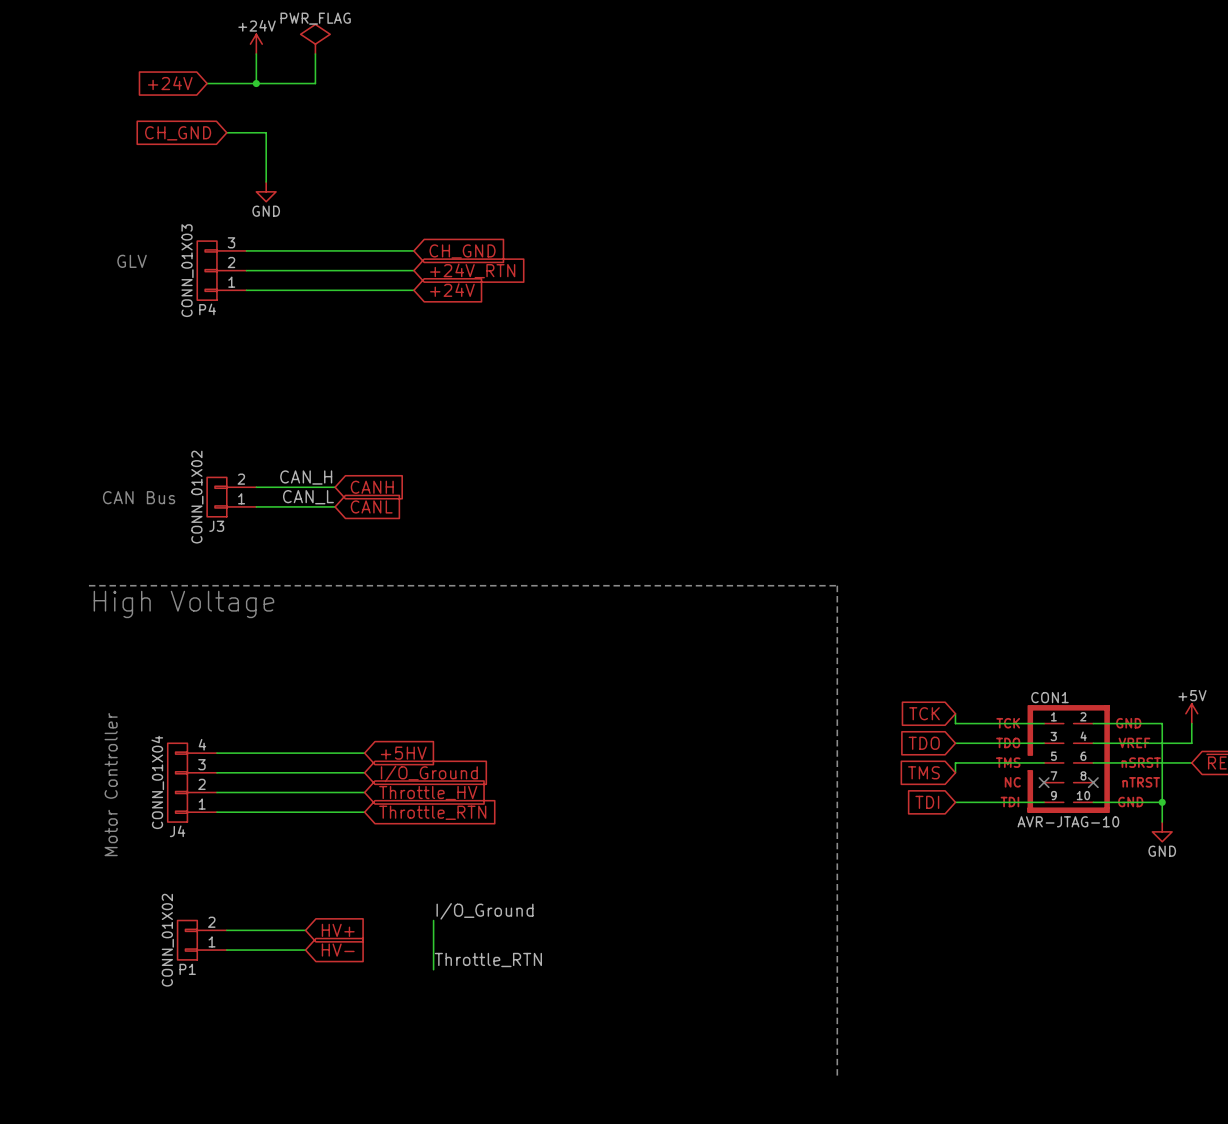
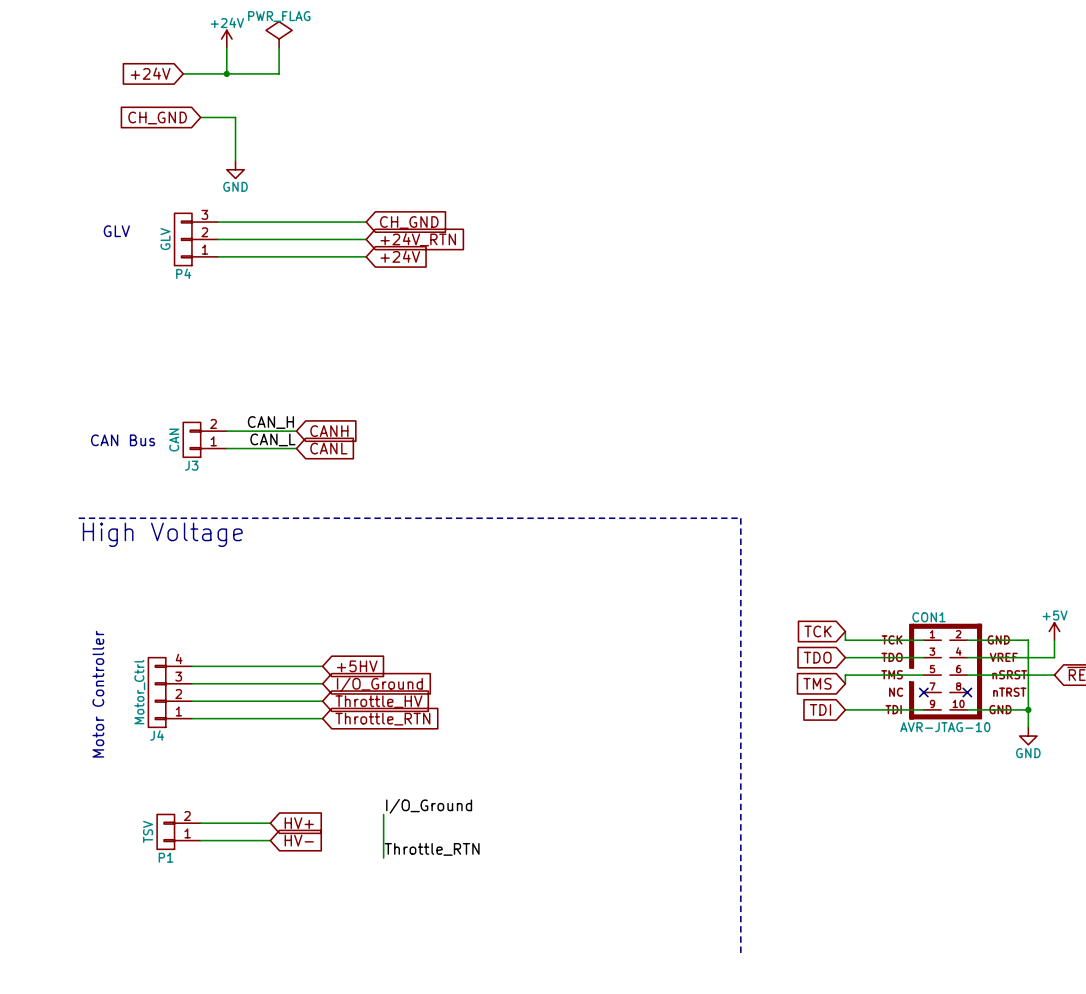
P4 value: CONN_01X03 (187, 270) -> GLV (165, 239)
J3 value: CONN_01X02 (197, 497) -> CAN (174, 440)
J4 value: CONN_01X04 (157, 782) -> Motor_Ctrl (139, 692)
P1 value: CONN_01X02 (167, 940) -> TSV (148, 831)

